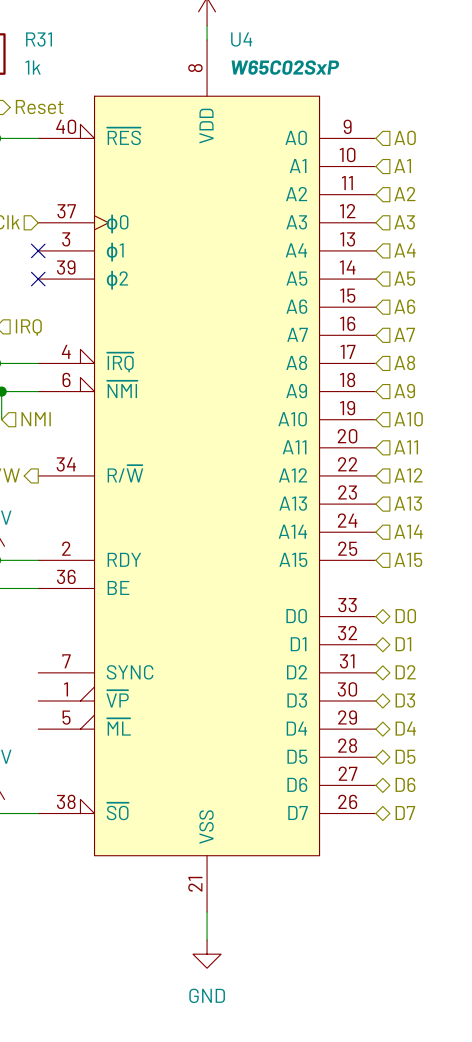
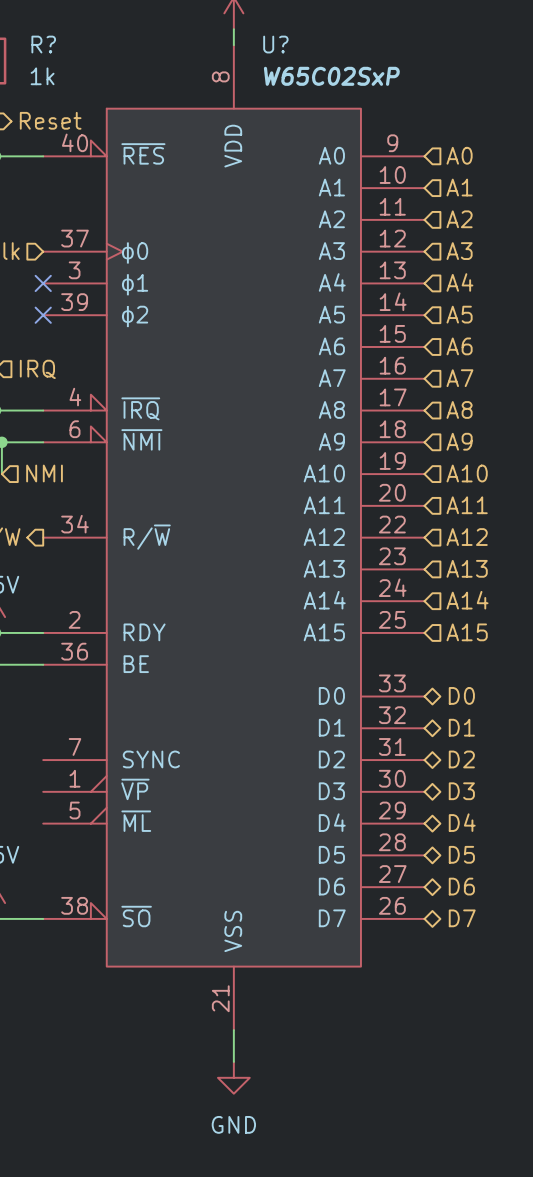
R31 name: R31 (39, 39) -> R? (43, 44)
U4 name: U4 (241, 39) -> U? (275, 44)

